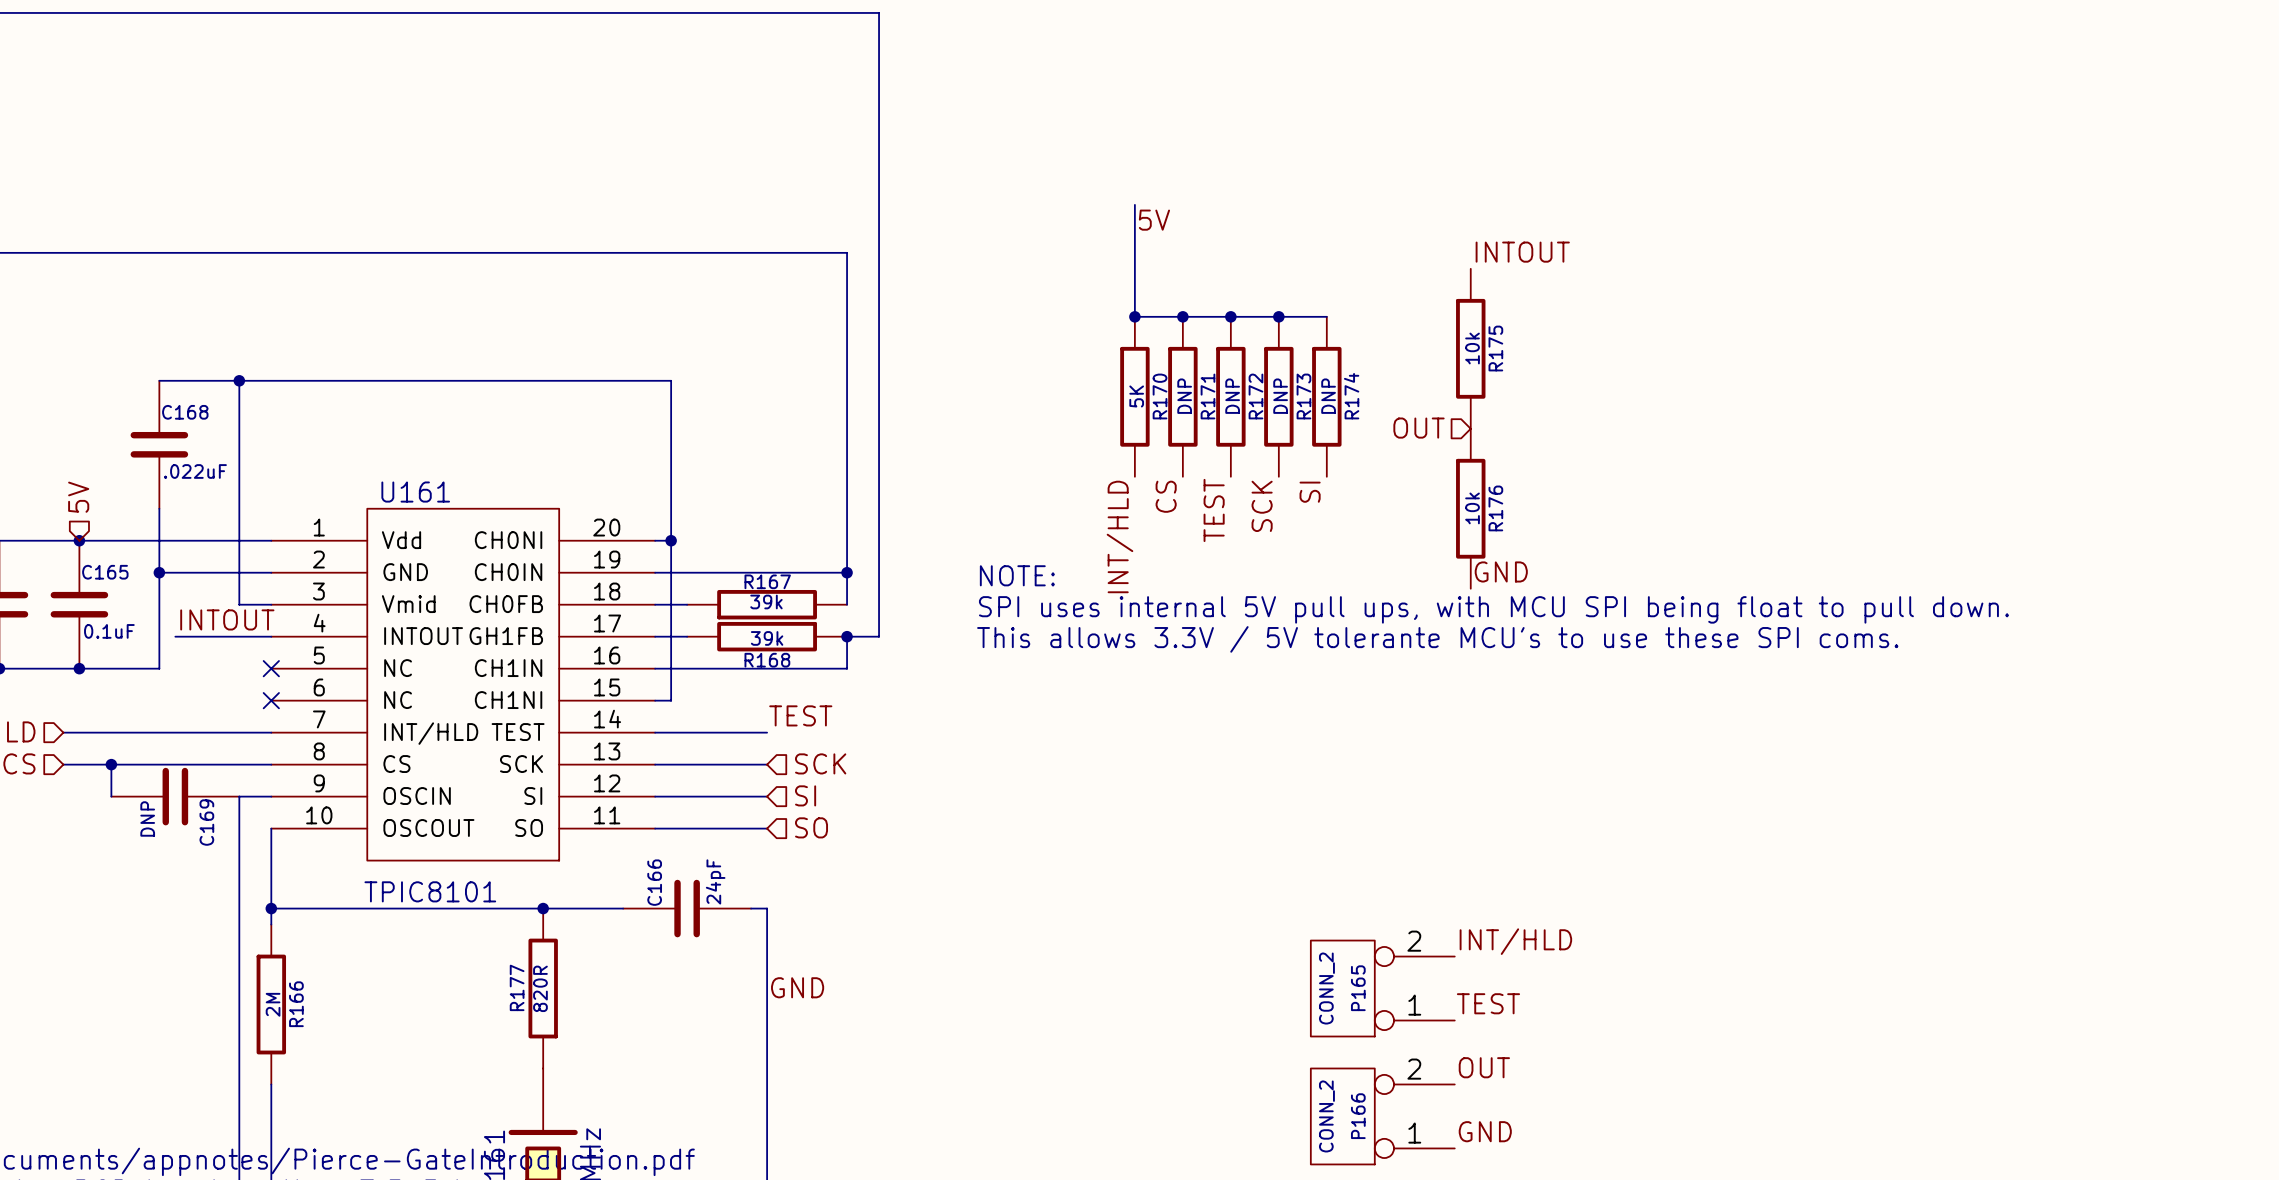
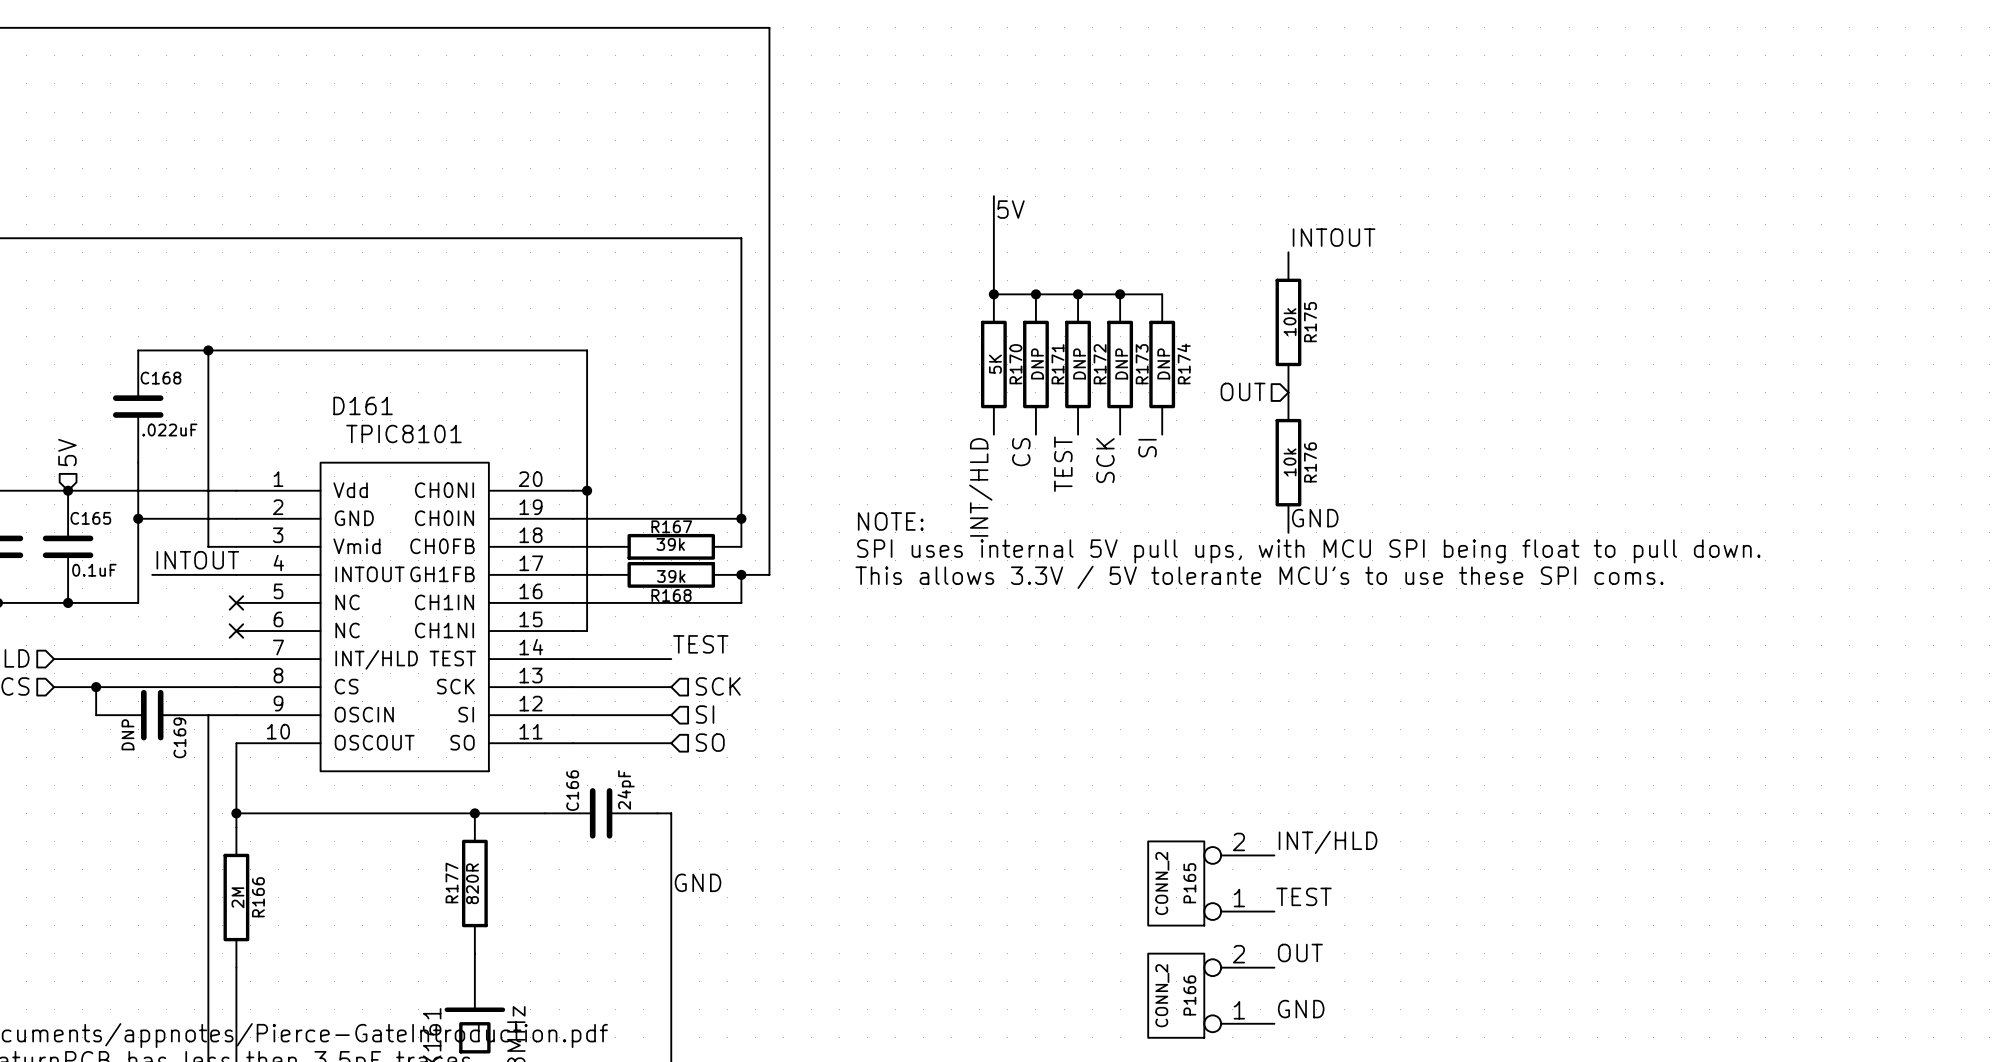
U161 name: U161 (415, 492) -> D161 (363, 405)
U161 value position: TPIC8101 (430, 891) -> TPIC8101 (403, 433)

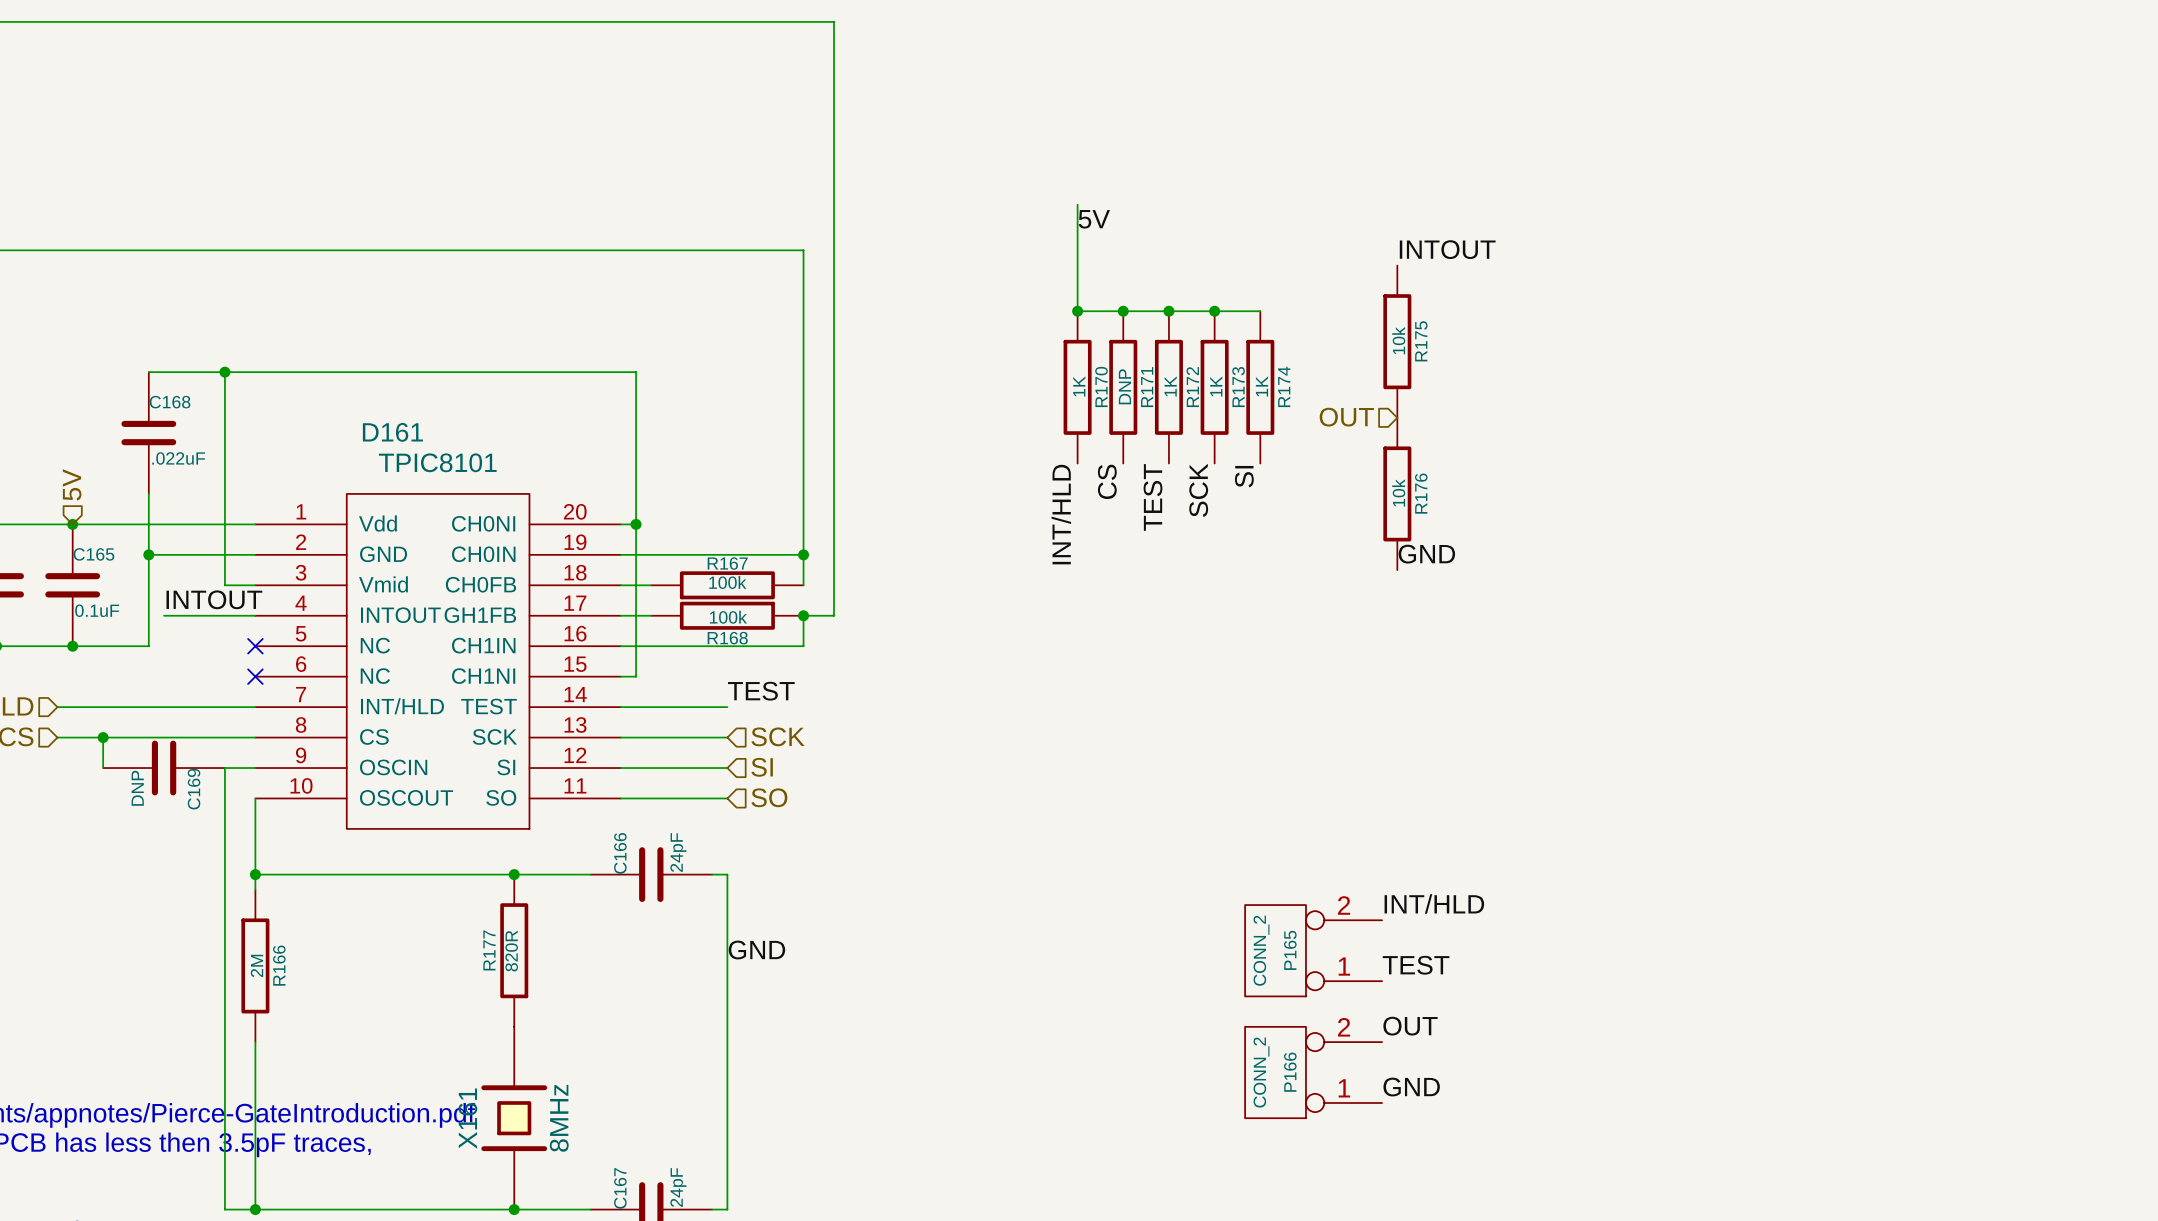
R172 value: DNP (1079, 363) -> 1K (1170, 386)
R173 value: DNP (1121, 363) -> 1K (1216, 386)
R174 value: DNP (1163, 363) -> 1K (1261, 386)
R170 value: 5K (995, 364) -> 1K (1079, 386)
text: NOTE: (890, 521) -> none
R167 value: 39k (670, 544) -> 100k (727, 582)
text: SPI uses internal 5V pull ups, with MCU SPI being float to pull down. (1308, 551) -> none
R168 value: 39k (671, 576) -> 100k (728, 617)
text: This allows 3.3V / 5V tolerante MCU's to use these SPI coms. (1259, 577) -> none

